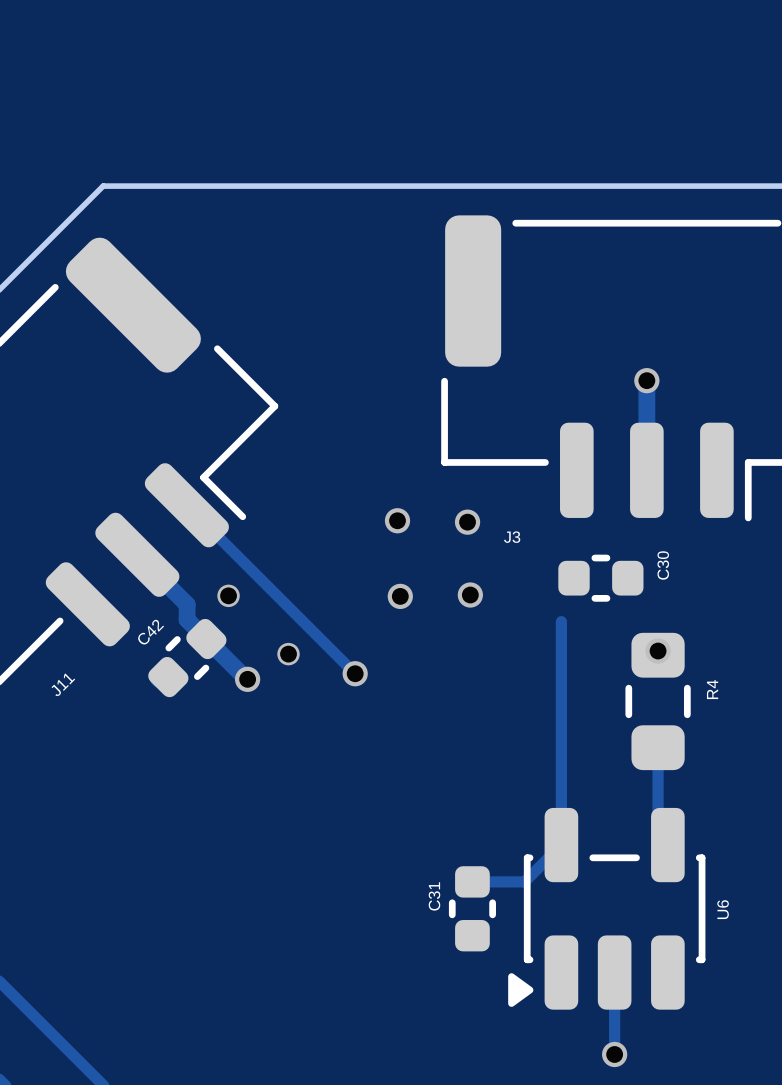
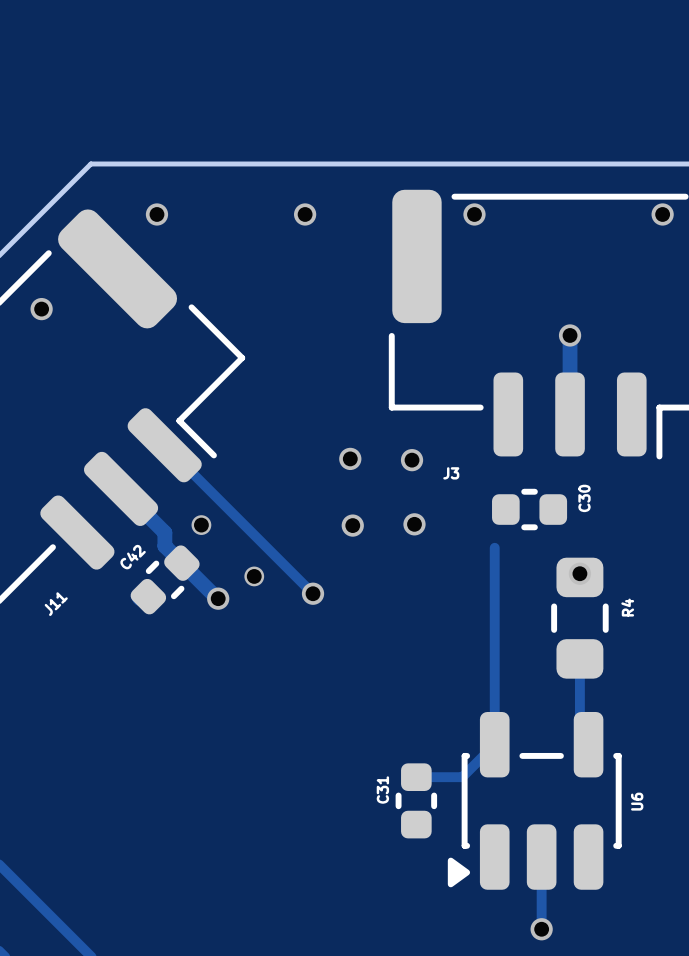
via: none -> (156, 214)
via: none -> (305, 214)
via: none -> (474, 214)
via: none -> (662, 214)
via: none -> (41, 309)

